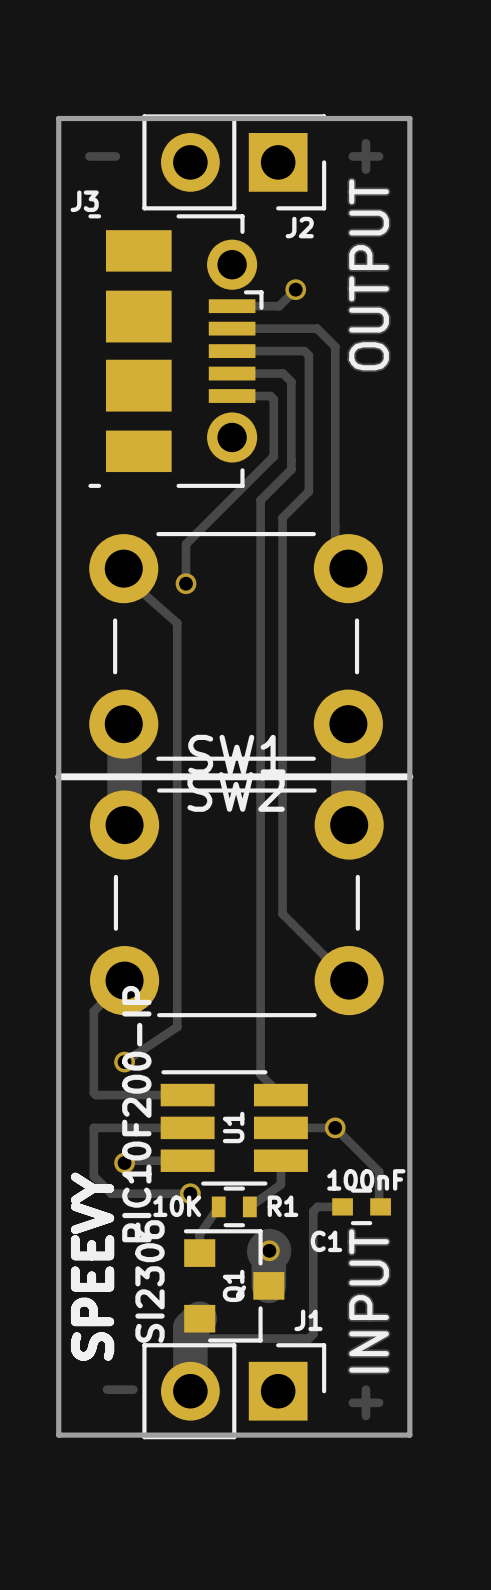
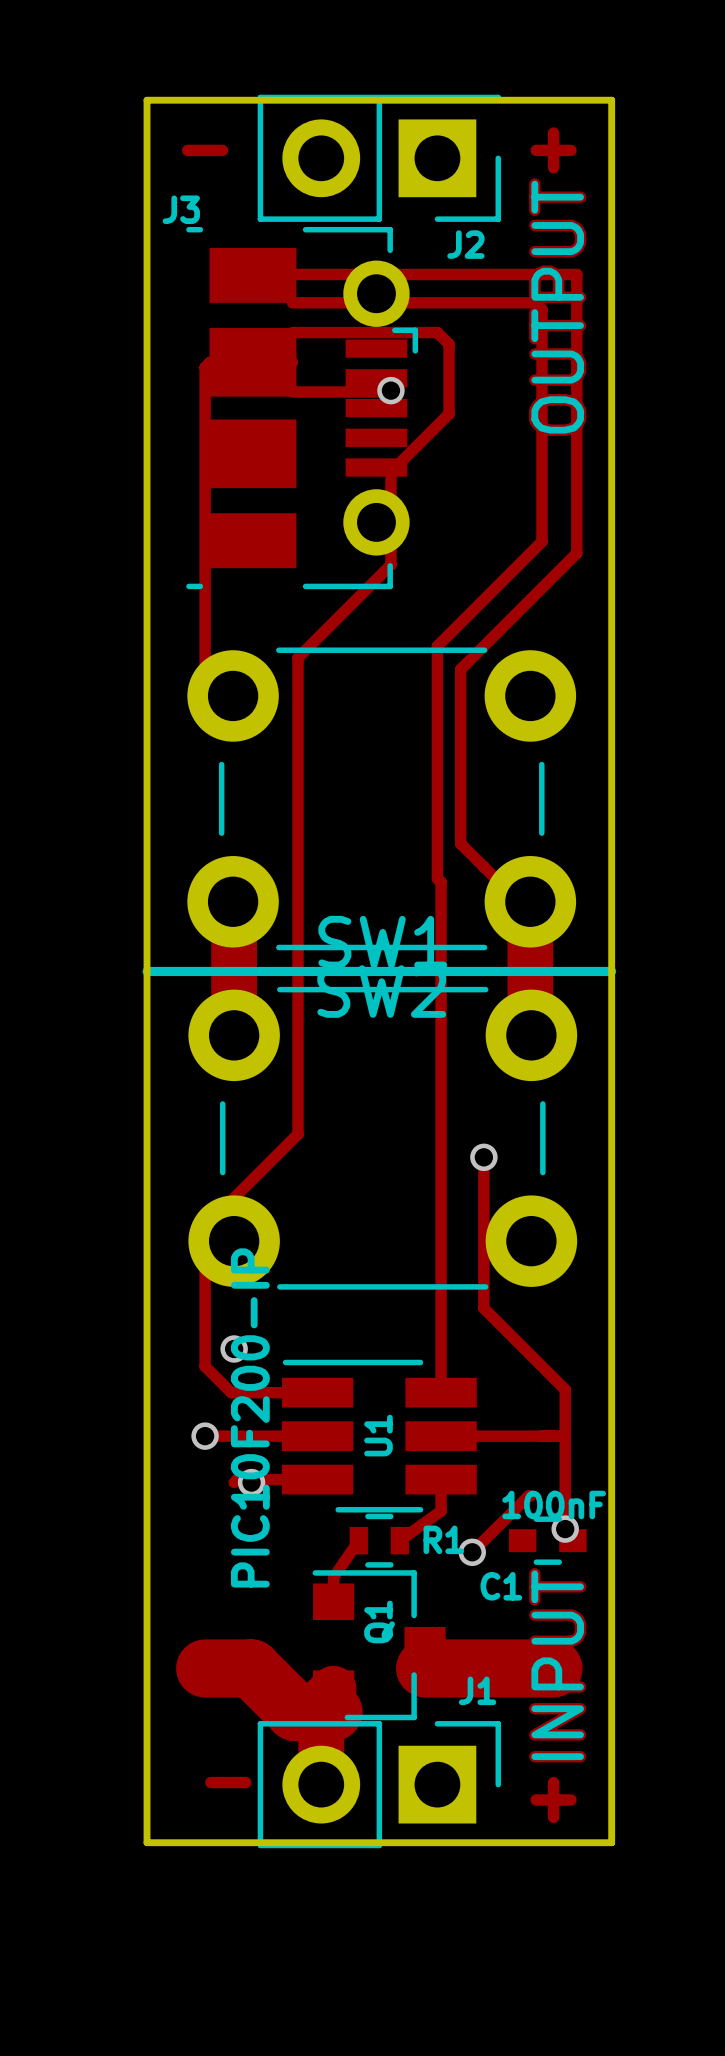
track: none -> (292, 273) (576, 274) (576, 553) (460, 669) (460, 843) (530, 913) (553, 913)
track: (295, 289) (279, 306) (232, 306) -> none
via position: (295, 289) -> (390, 390)
track: (232, 328) (317, 328) (335, 346) (335, 555) (348, 568) -> none
track: none -> (390, 390) (292, 392)
track: (232, 351) (304, 351) (308, 355) (308, 491) (282, 517) (282, 913) (349, 980) -> none
track: (232, 373) (283, 373) (291, 381) (291, 469) (260, 500) (260, 1074) (280, 1095) -> (292, 302) (535, 302) (541, 309) (541, 541) (437, 646) (437, 878) (441, 882) (441, 1391)
track: (232, 396) (270, 396) (273, 399) (273, 456) (186, 544) (186, 583) -> none
track: (102, 557) (177, 623) (177, 1026) (124, 1062) -> (205, 681) (205, 367) (210, 362) (292, 362)
via: (186, 583) -> none
track: none -> (483, 1157) (483, 1308) (565, 1389) (565, 1529)
via: none -> (483, 1157)
track: (124, 980) (93, 1011) (93, 1092) (96, 1095) (122, 1095) -> (292, 332) (437, 332) (449, 344) (449, 413) (390, 471) (390, 564) (298, 657) (298, 1134) (205, 1227) (205, 1366) (231, 1392)
track: (102, 1127) (93, 1127) (93, 1176) (111, 1193) (190, 1193) -> none
via: none -> (205, 1436)
track: (335, 1127) (379, 1171) (380, 1206) -> (512, 1436) (565, 1436)
via: (335, 1127) -> none
via position: (124, 1163) -> (251, 1482)
track: none -> (530, 1496) (472, 1552)
via: (190, 1193) -> none
via: none -> (565, 1529)
R1 value: 10K (177, 1206) -> none
track: (341, 1207) (317, 1206) (313, 1211) (313, 1334) (308, 1338) (190, 1338) -> none
via: none -> (472, 1552)
track: (269, 1250) (268, 1285) -> none
via: (269, 1250) -> none
text: SPEEVY (92, 1266) -> none
Q1 value: SI2306 (149, 1281) -> none
Q1 name position: Q1 (234, 1285) -> Q1 (379, 1621)
track: none -> (205, 1668) (251, 1668) (295, 1711) (333, 1711)
track: none -> (425, 1668) (553, 1668)

